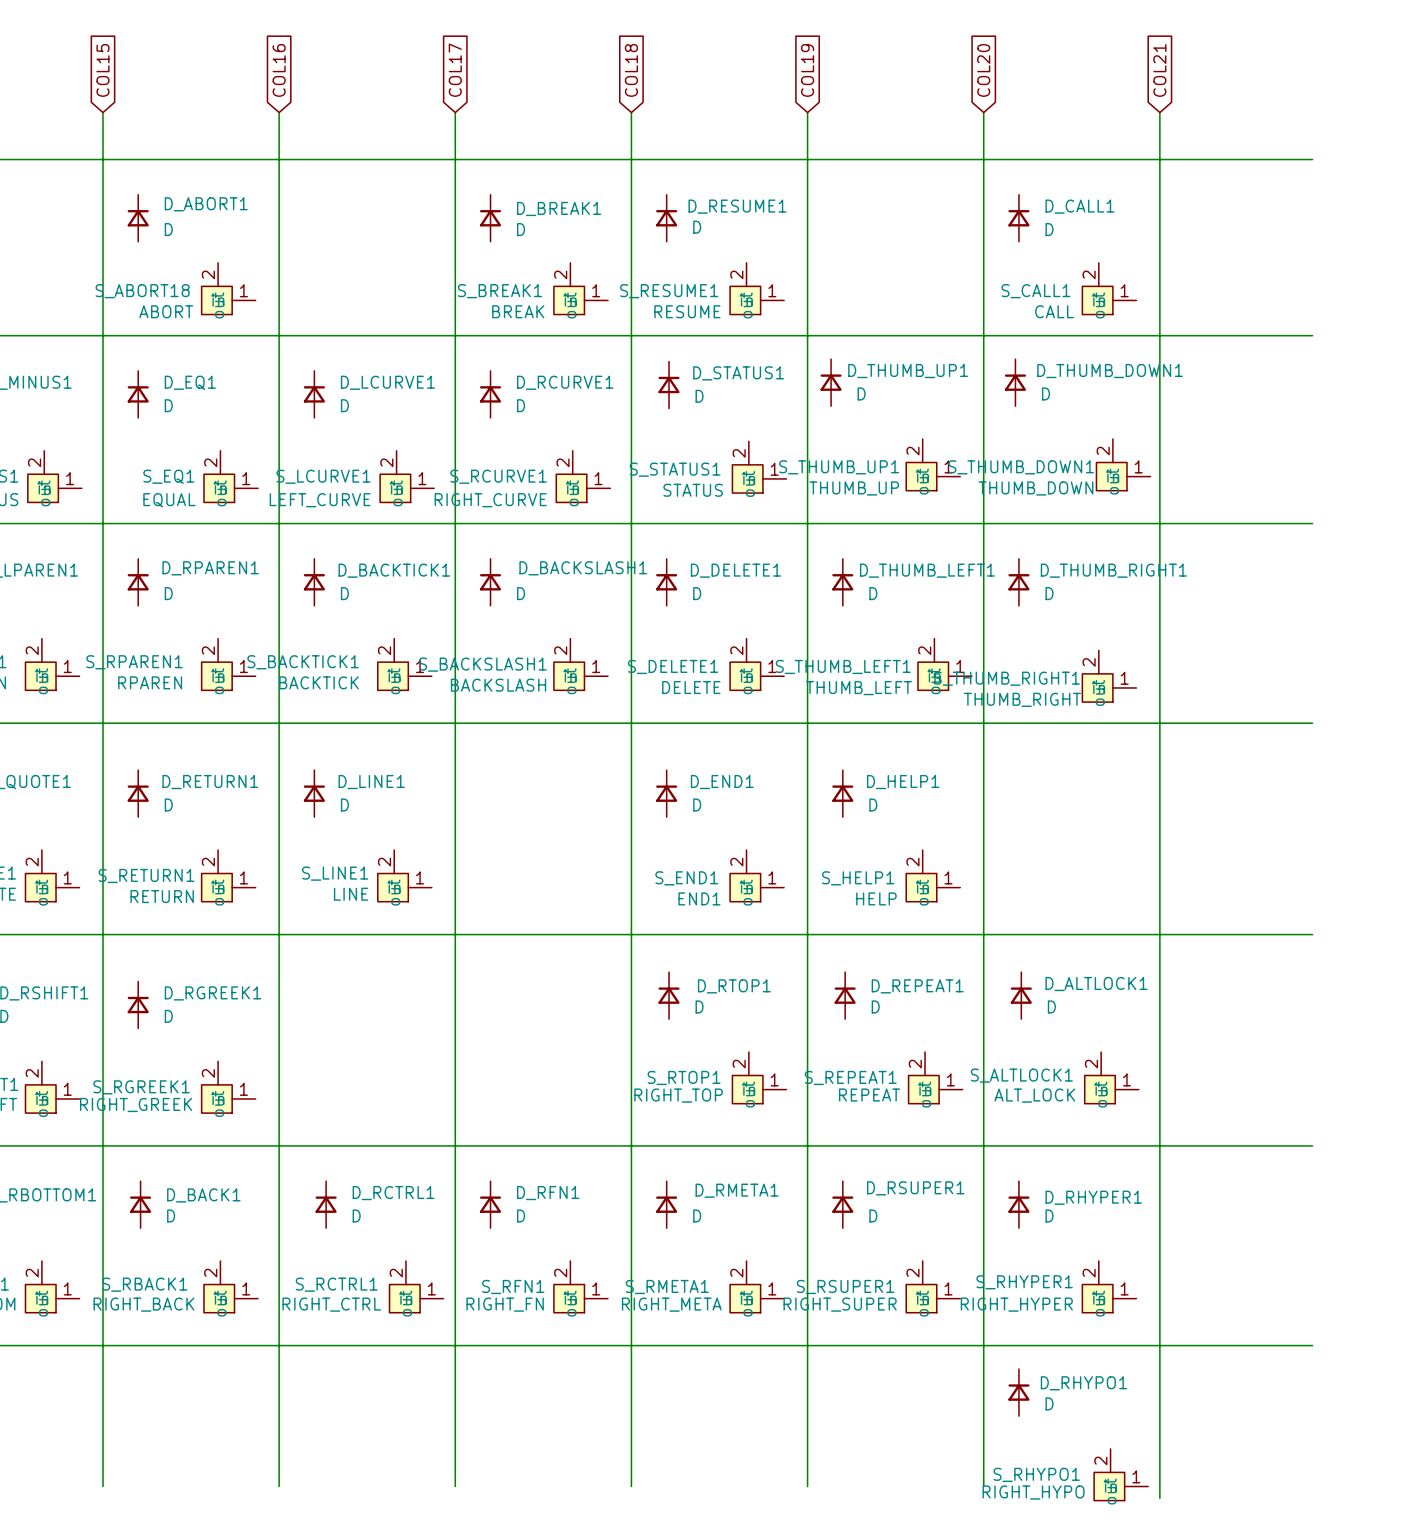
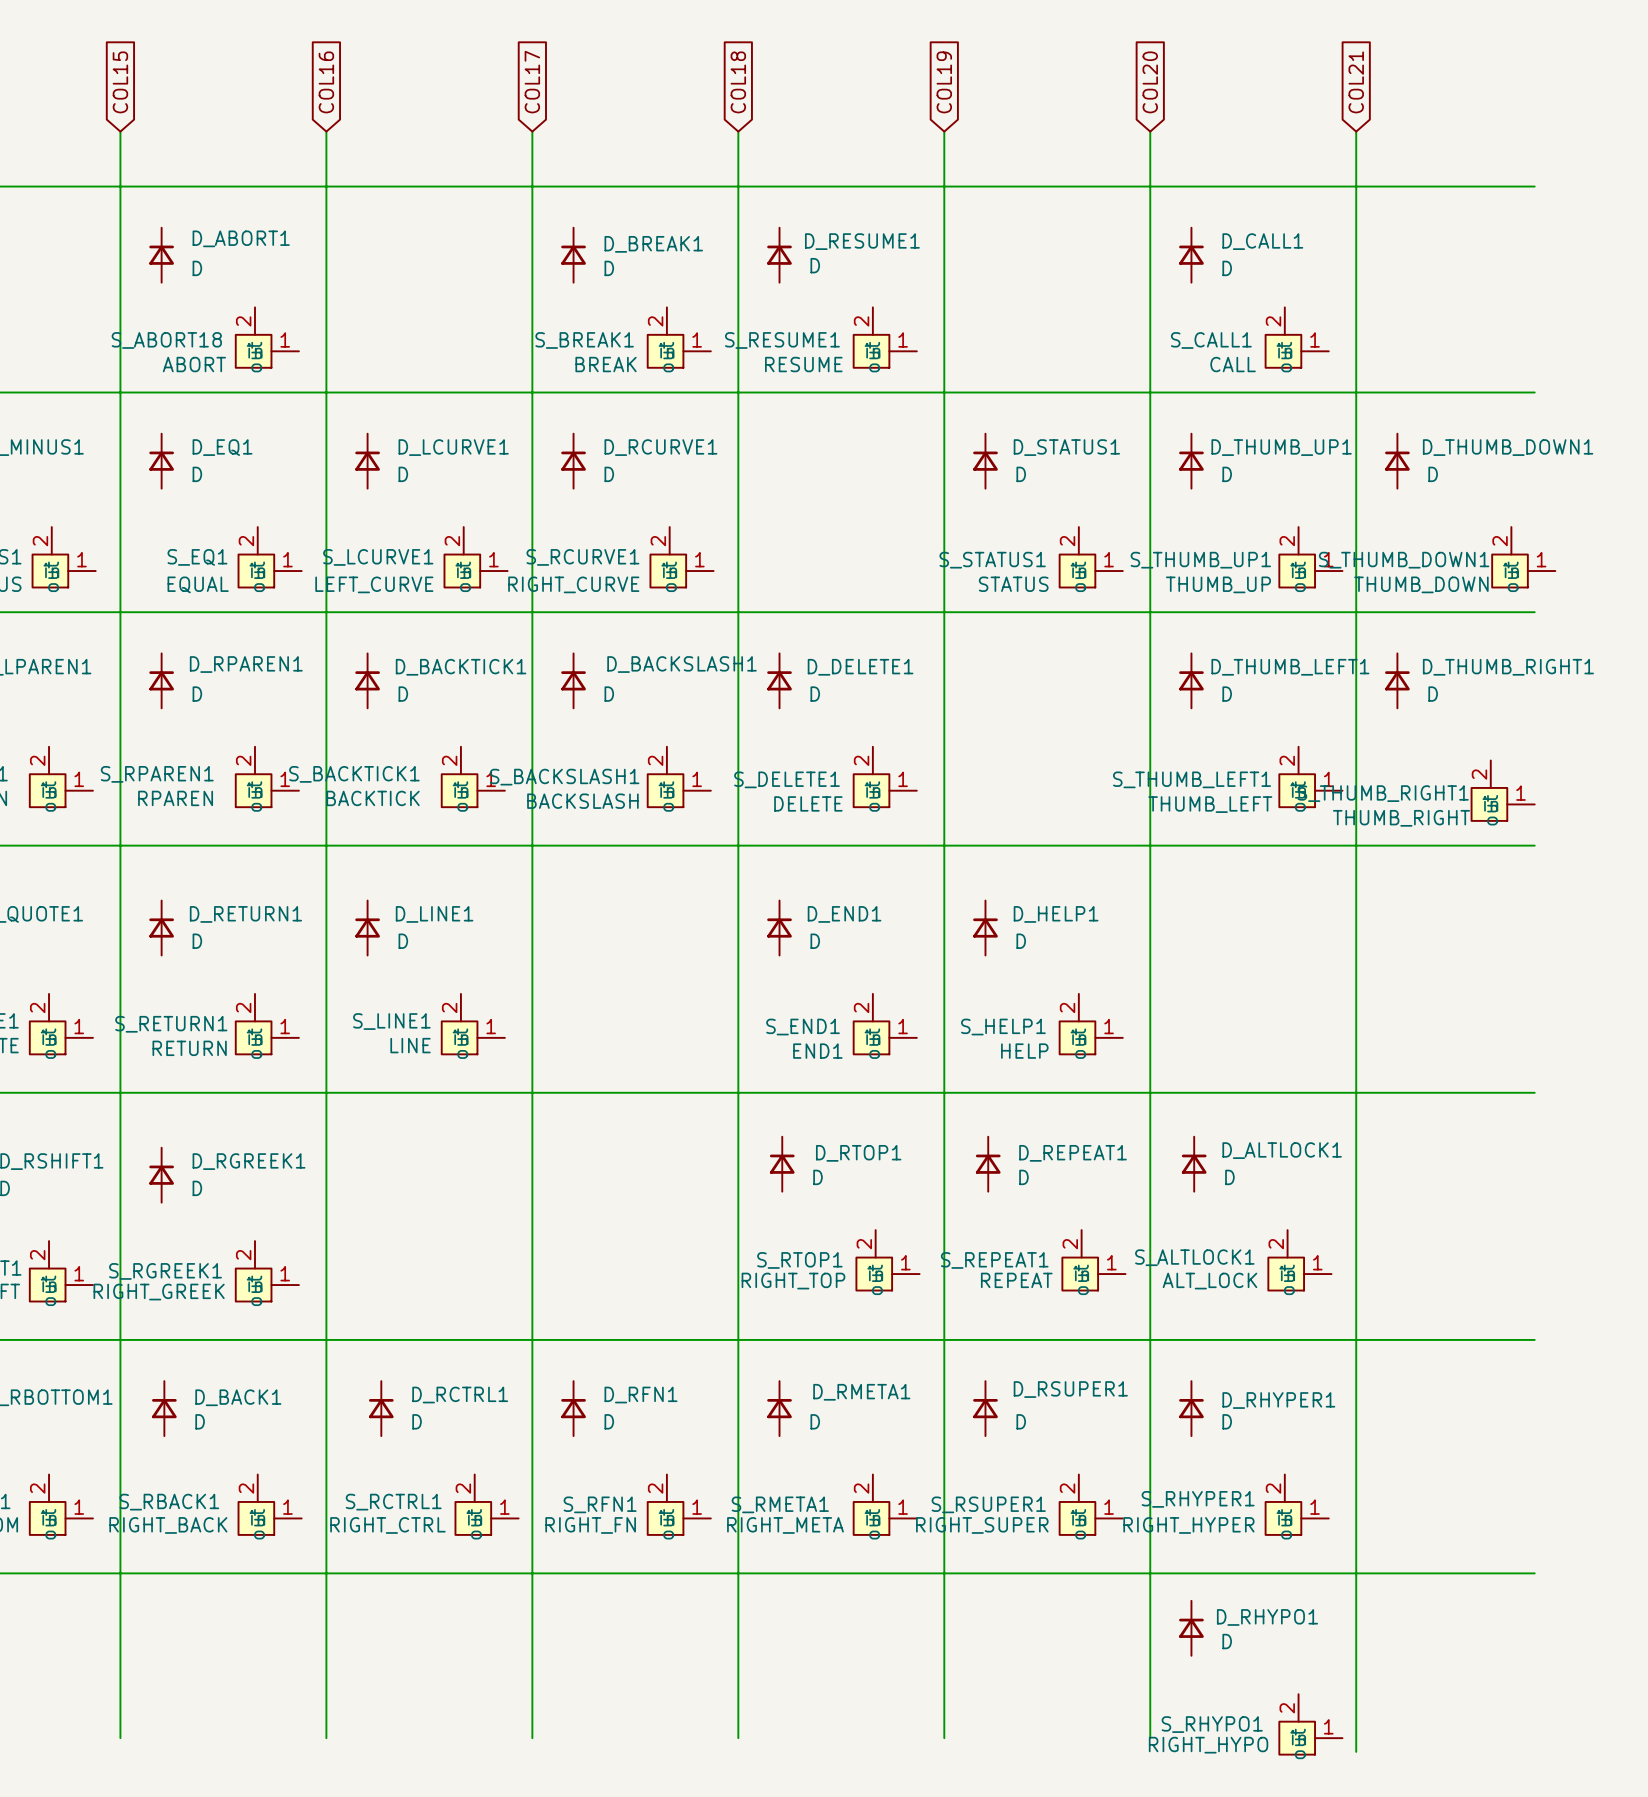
D_THUMB_UP1 position: (831, 382) -> (1191, 461)
D_THUMB_DOWN1 position: (1015, 382) -> (1397, 461)
D_STATUS1 position: (669, 385) -> (985, 461)
S_THUMB_UP1 position: (933, 464) -> (1310, 557)
S_THUMB_DOWN1 position: (1123, 464) -> (1523, 557)
S_STATUS1 position: (759, 467) -> (1091, 557)
D_THUMB_RIGHT1 name: D_THUMB_RIGHT1 (1113, 570) -> D_THUMB_LEFT1 (1290, 667)
D_THUMB_LEFT1: D (842, 582) -> none
D_THUMB_RIGHT1: none -> D (1397, 680)
S_THUMB_LEFT1 position: (944, 664) -> (1310, 776)
S_THUMB_RIGHT1 position: (1109, 676) -> (1503, 790)

